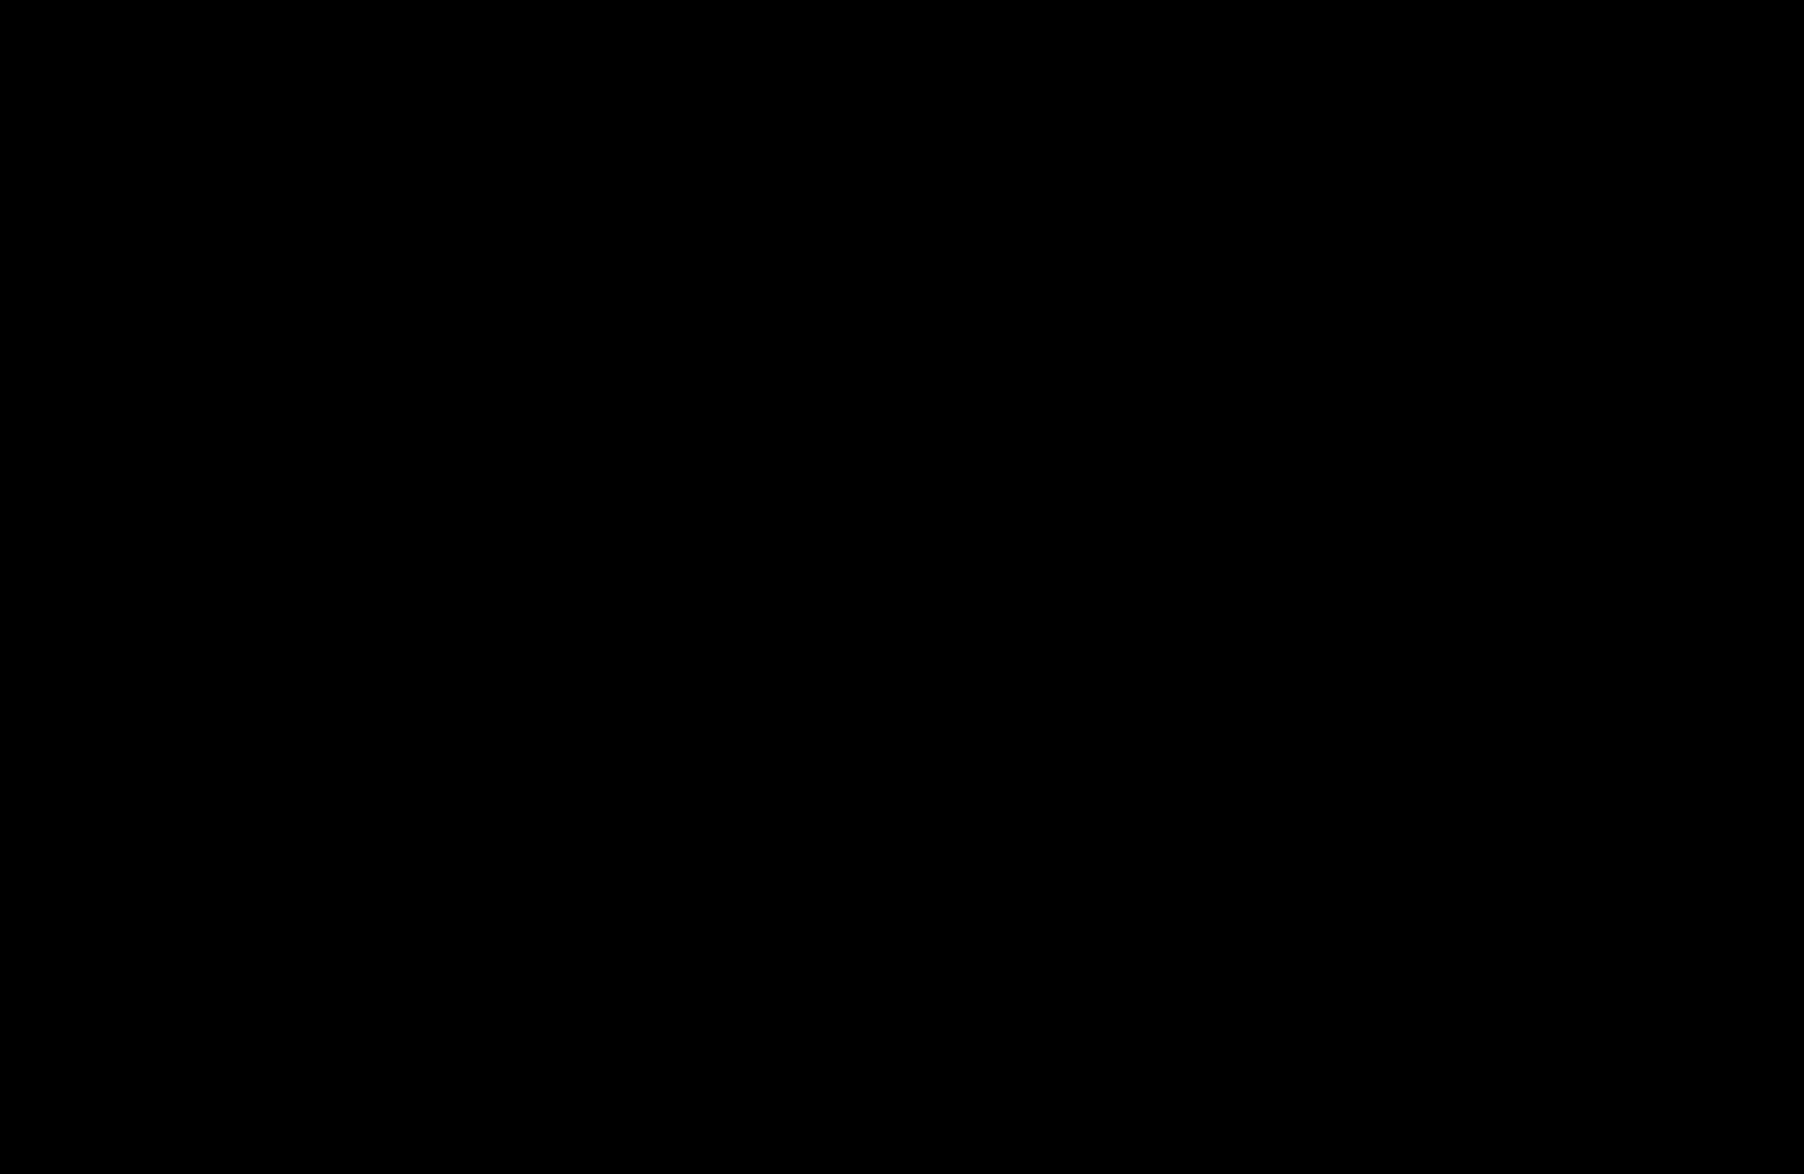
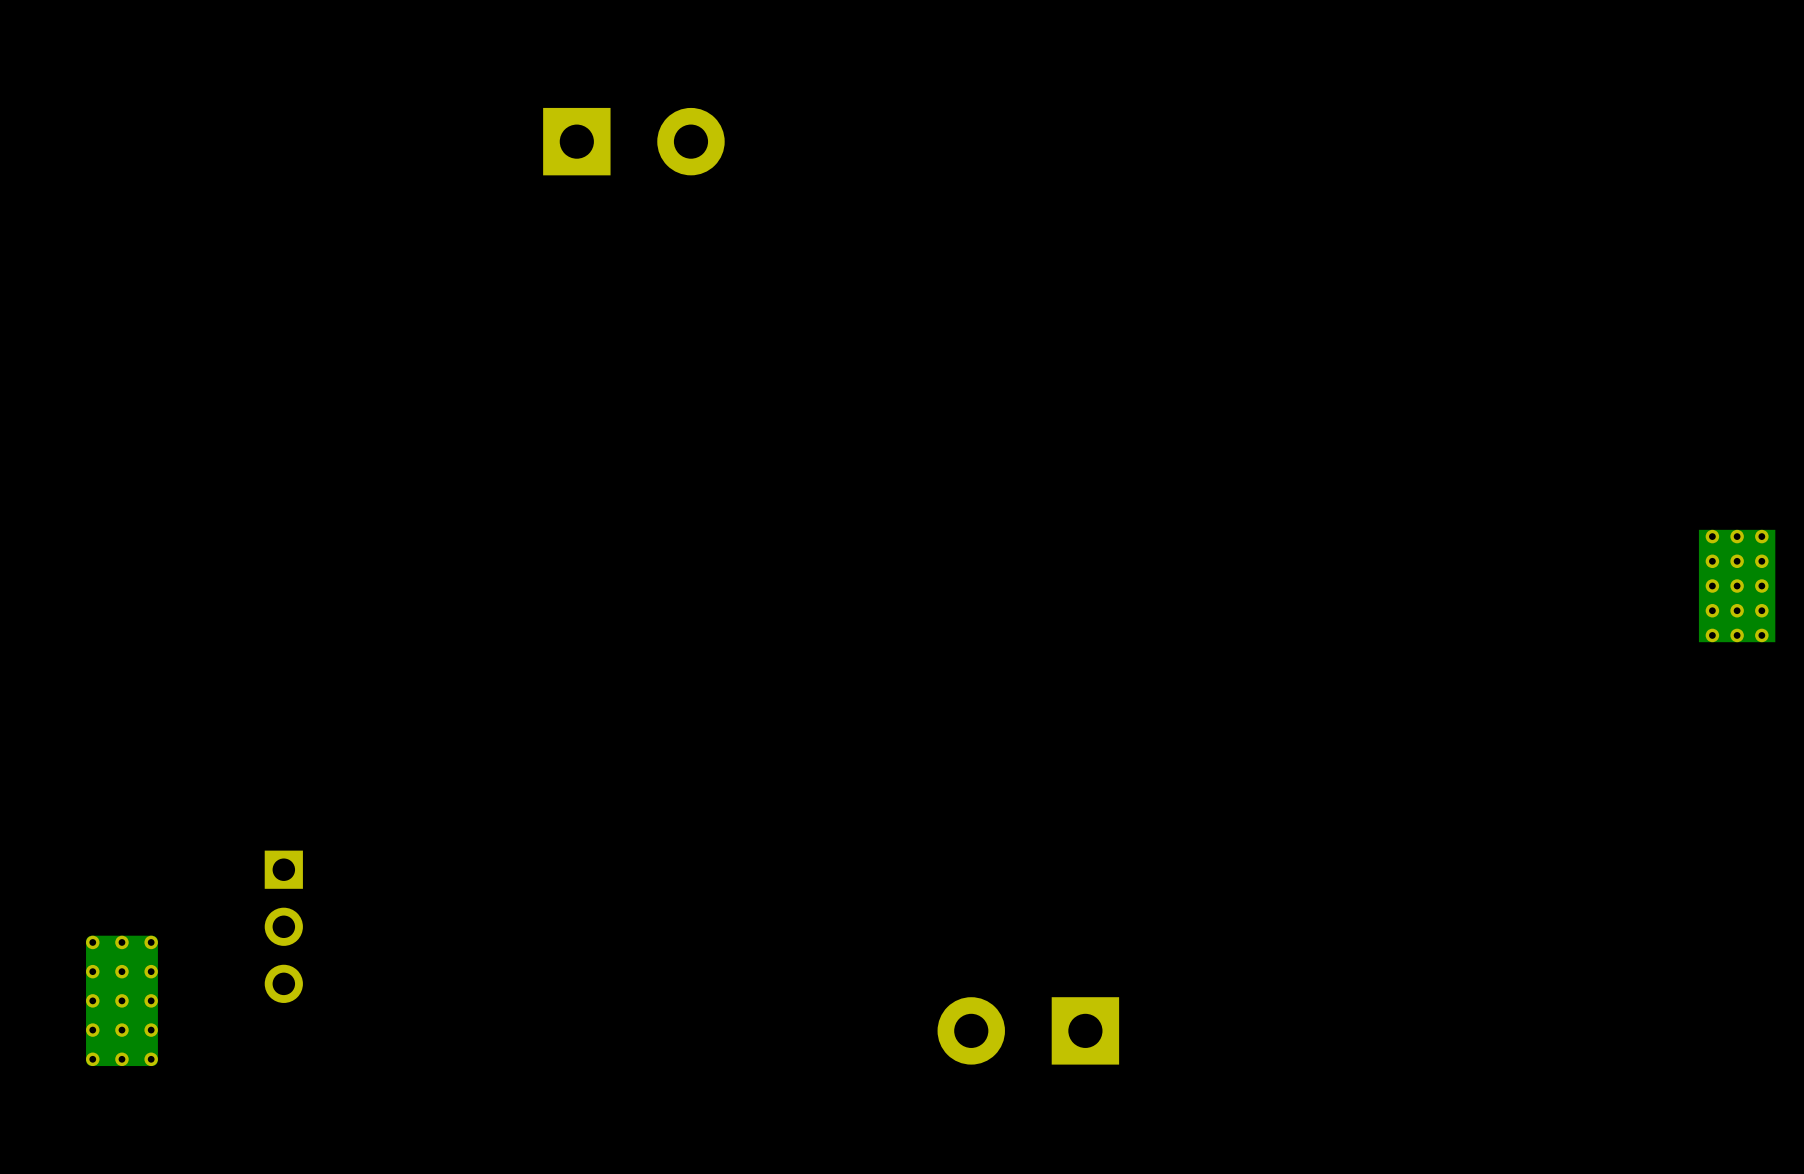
part: none -> (633, 141)
part: none -> (1737, 586)
part: none -> (283, 926)
part: none -> (121, 1000)
part: none -> (1028, 1030)

